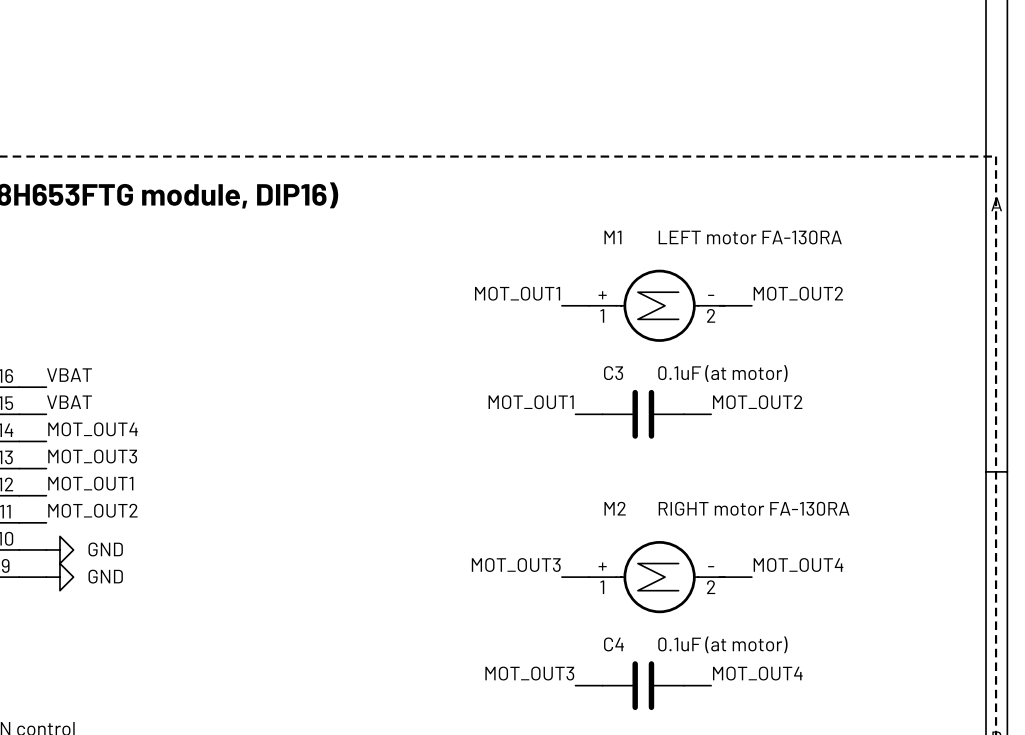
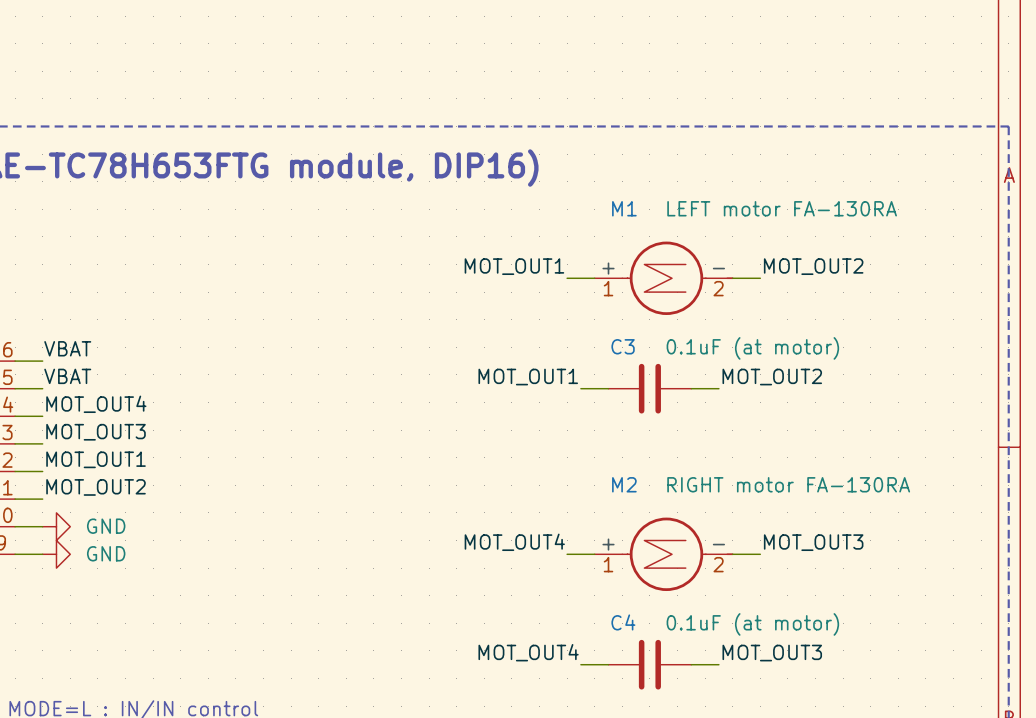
label: MOT_OUT3 (516, 565) -> MOT_OUT4 (514, 542)
label: MOT_OUT4 (798, 565) -> MOT_OUT3 (813, 542)
label: MOT_OUT3 (529, 673) -> MOT_OUT4 (528, 652)
label: MOT_OUT4 (757, 673) -> MOT_OUT3 (772, 653)

